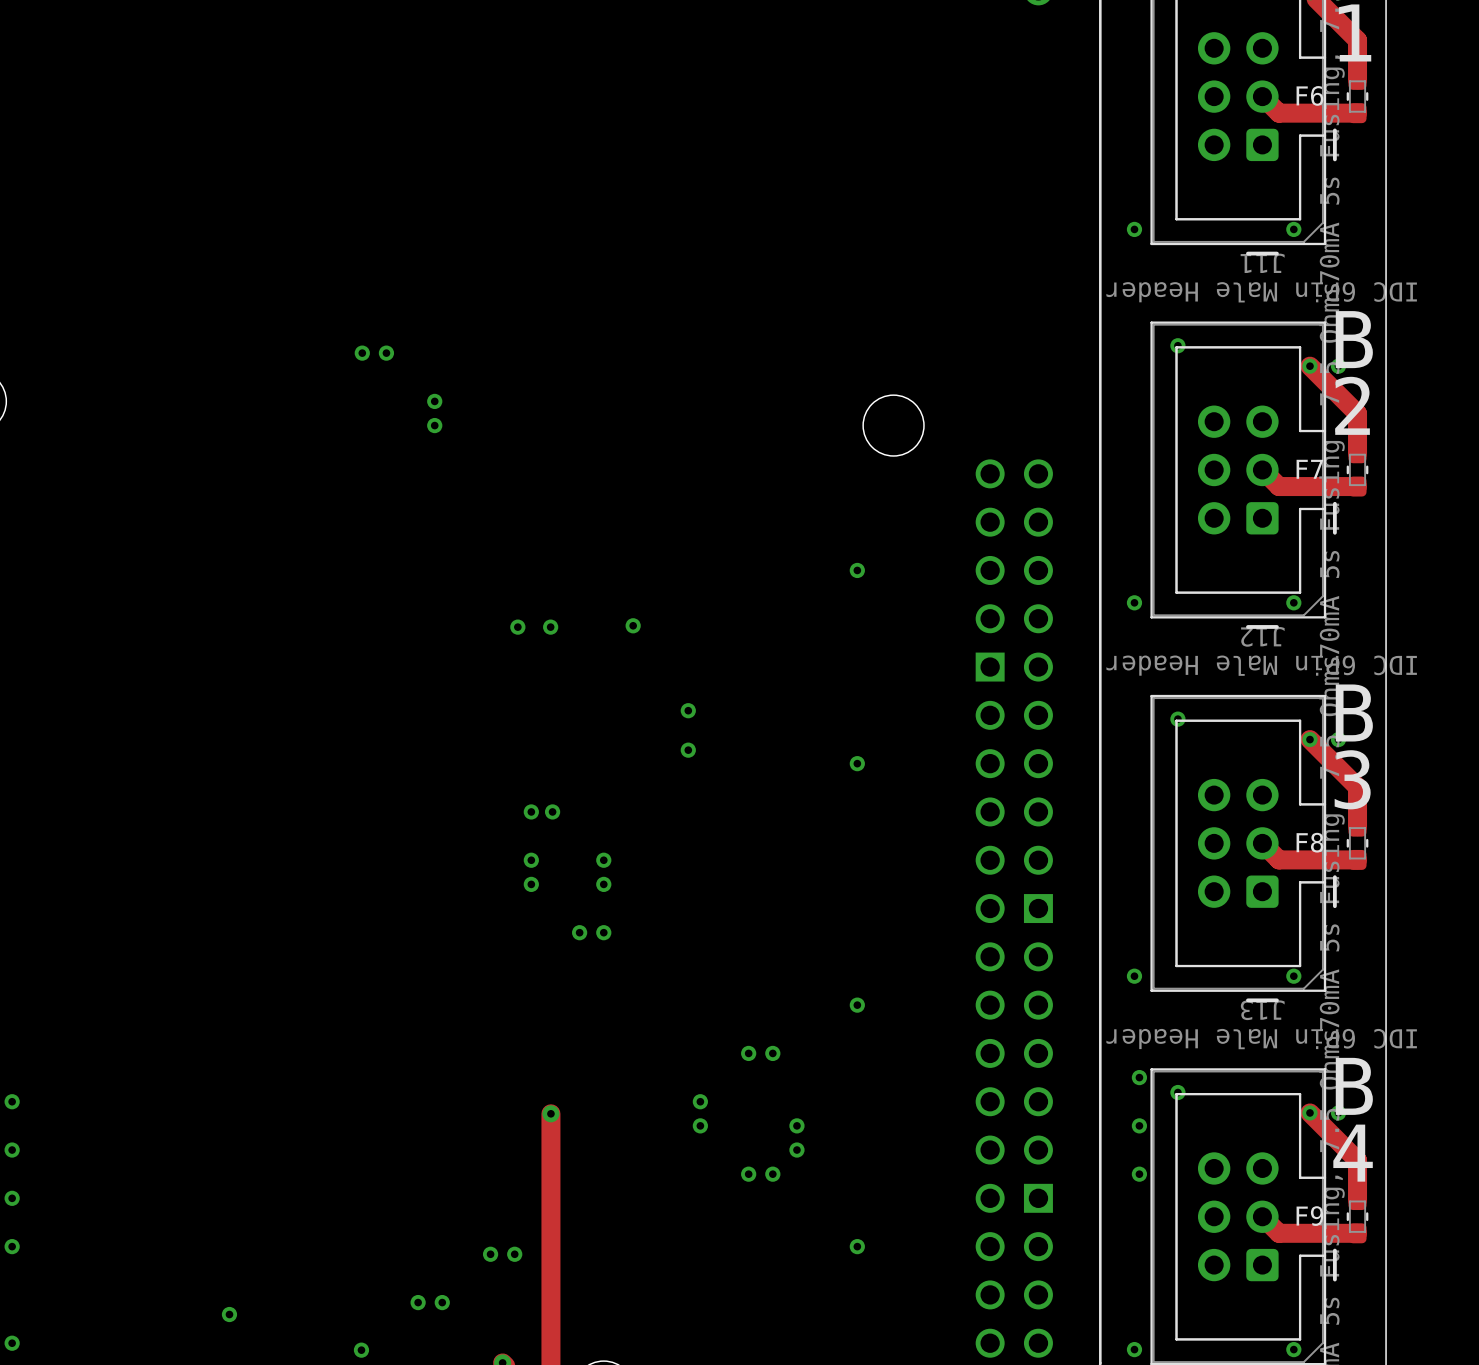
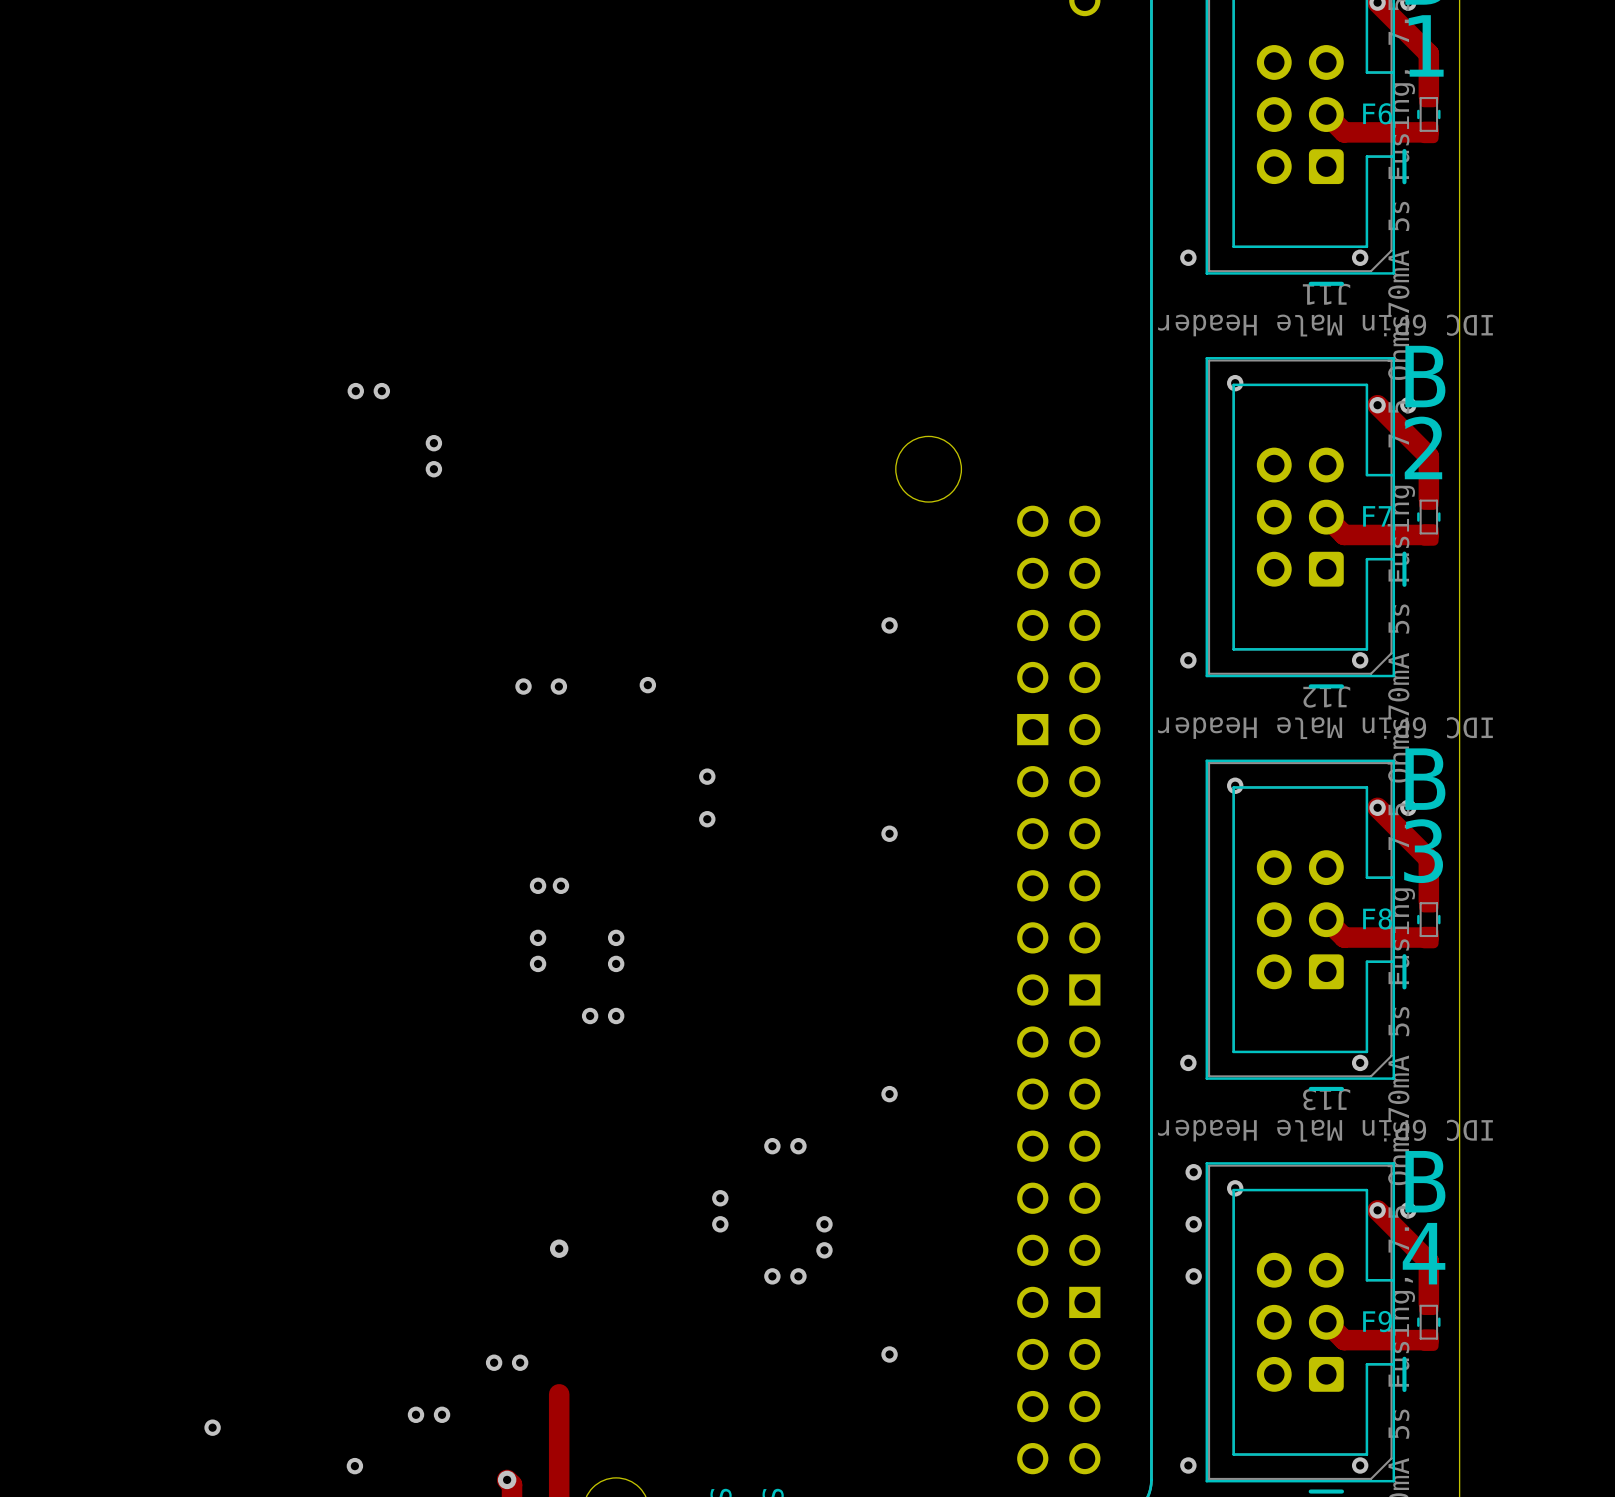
track: (550, 1113) (550, 1283) -> none
via position: (550, 1113) -> (559, 1248)

